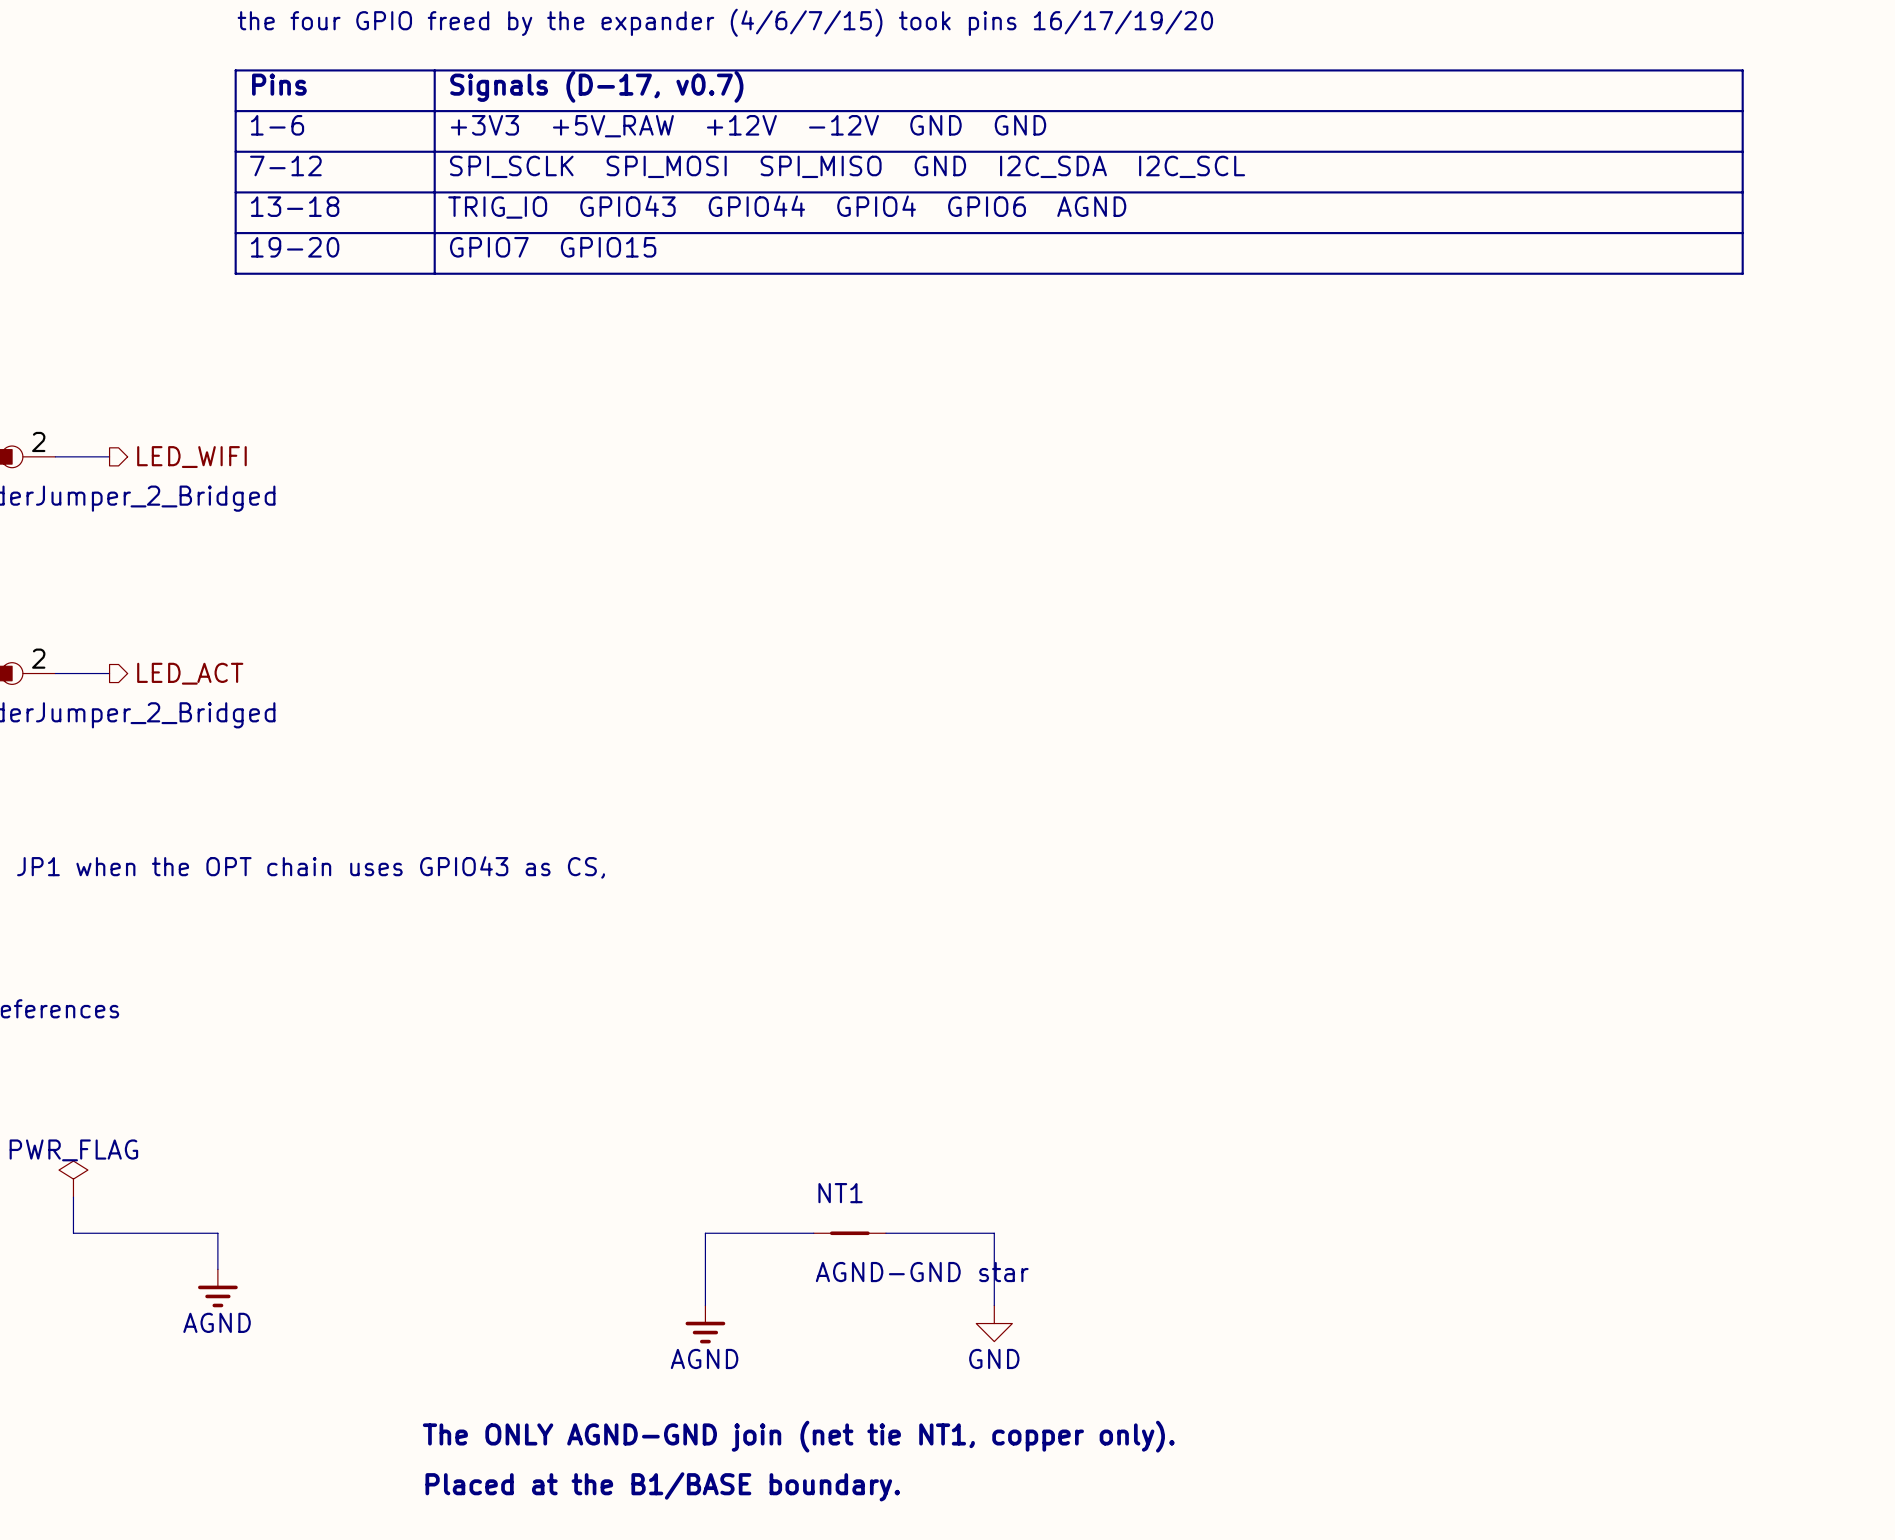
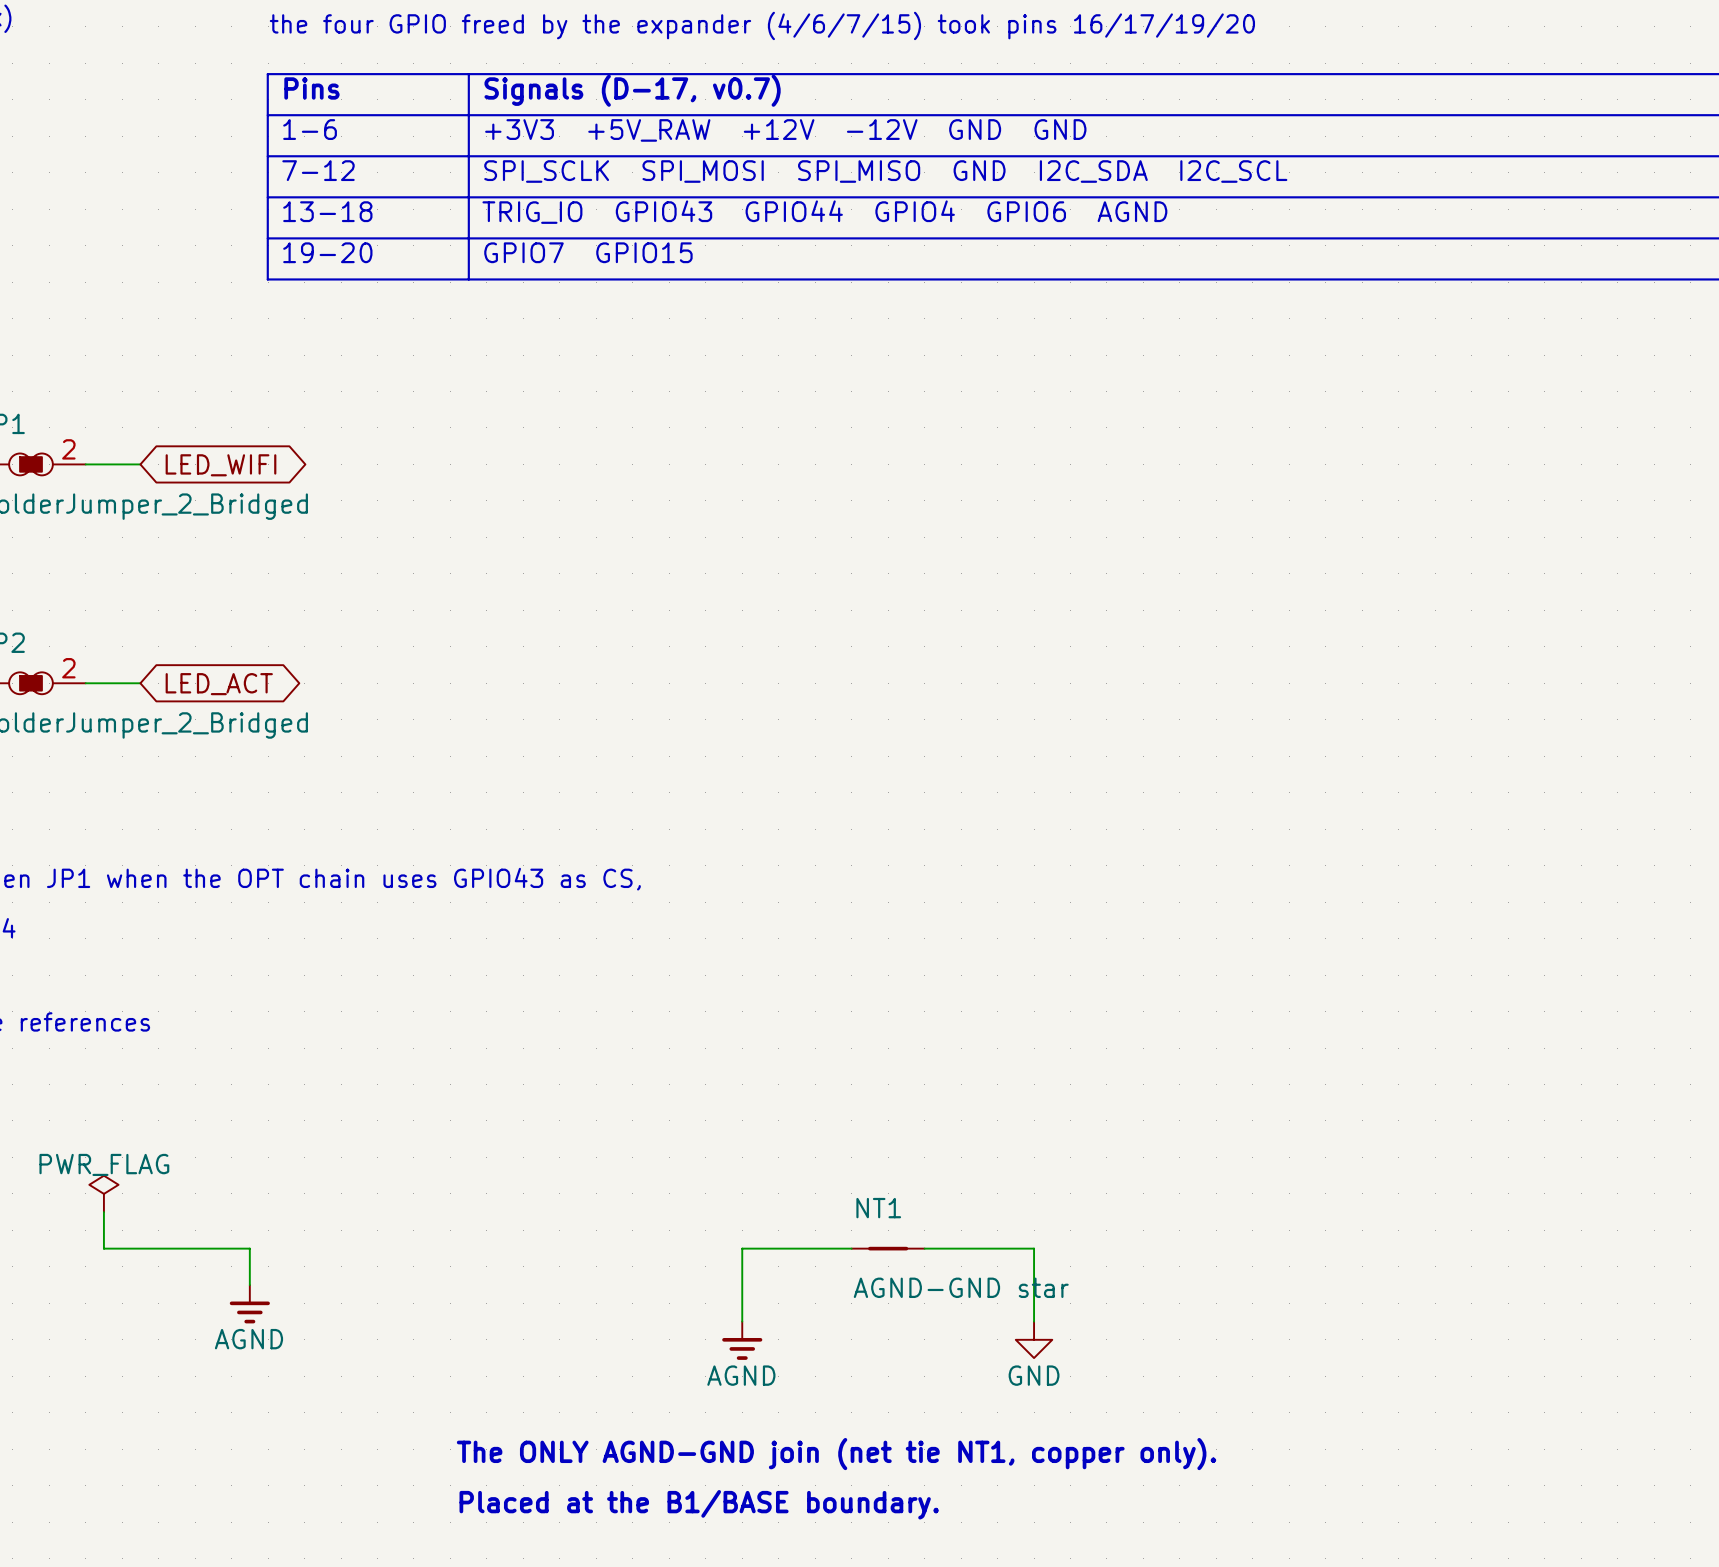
global label: none -> LED_WIFI (220, 465)
hierarchical label: LED_WIFI (191, 457) -> none
hierarchical label: LED_ACT (190, 673) -> none
global label: none -> LED_ACT (219, 684)

